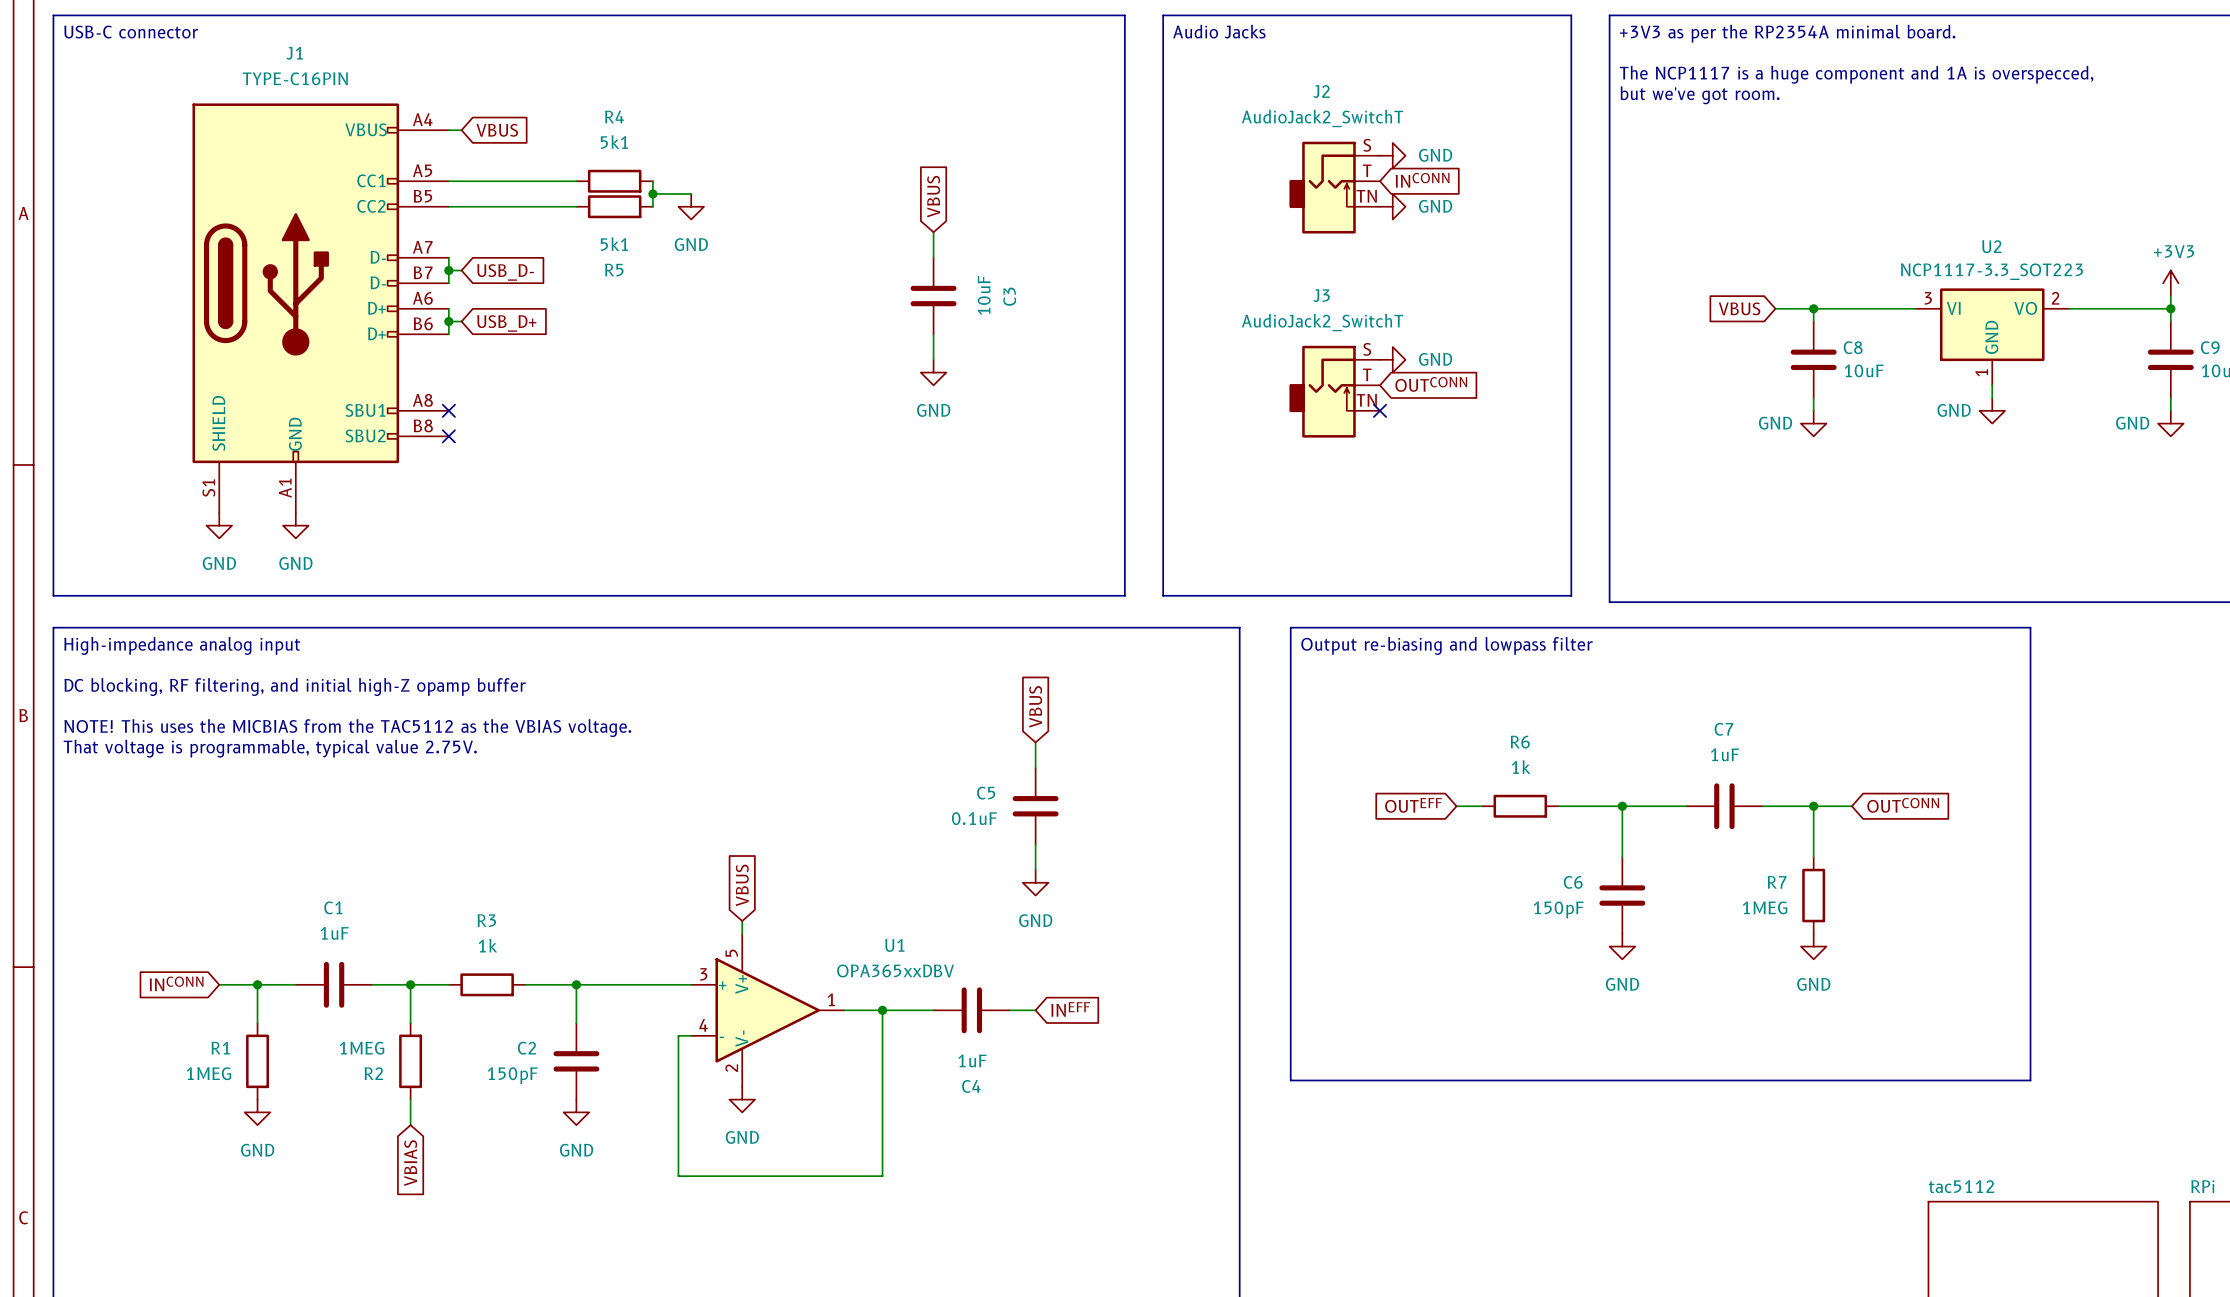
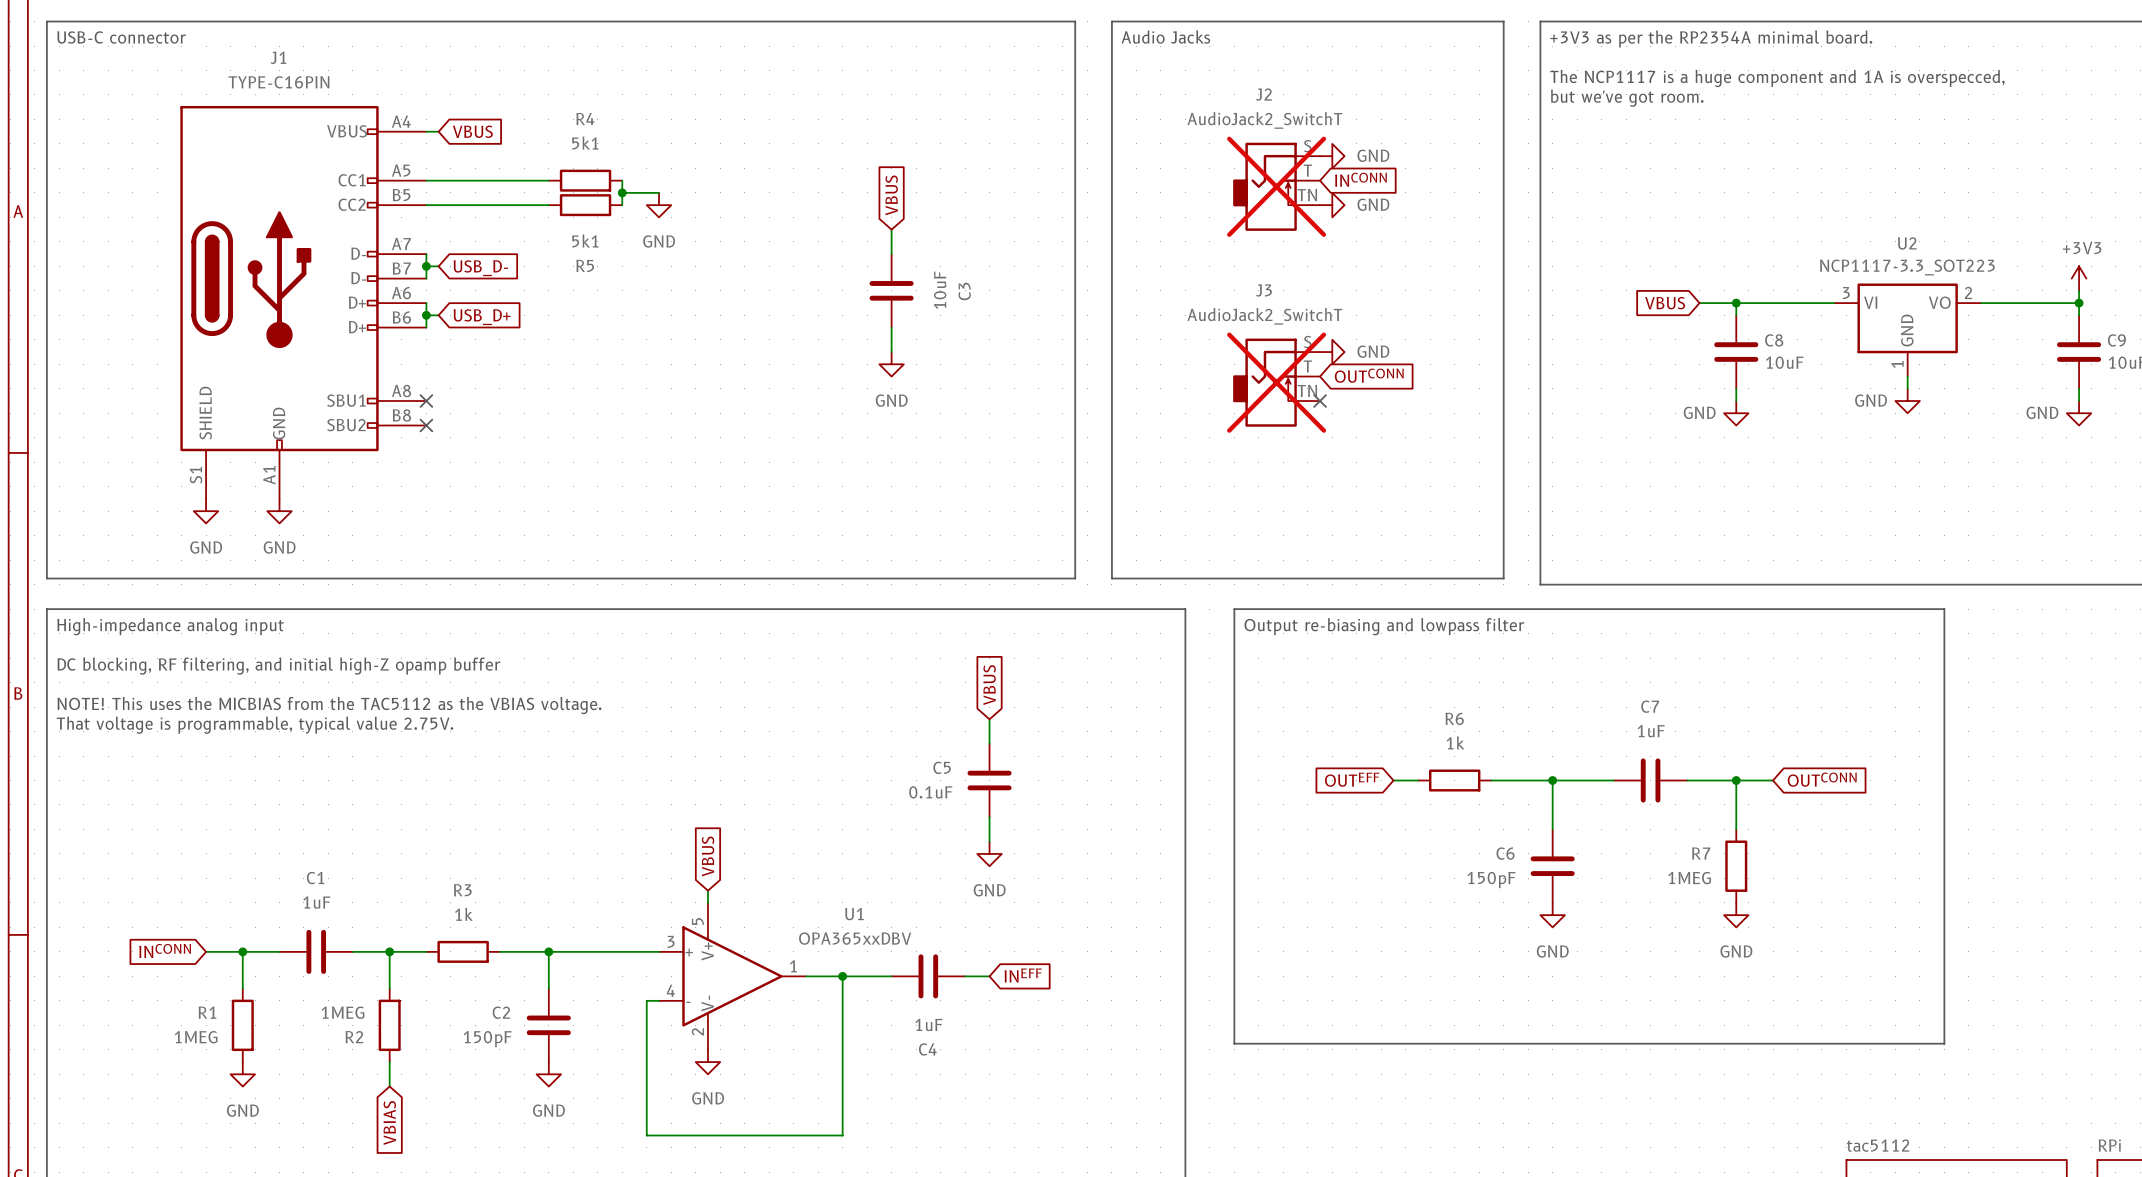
J2 do-not-place cross: none -> (1276, 186)
J3 do-not-place cross: none -> (1276, 382)

